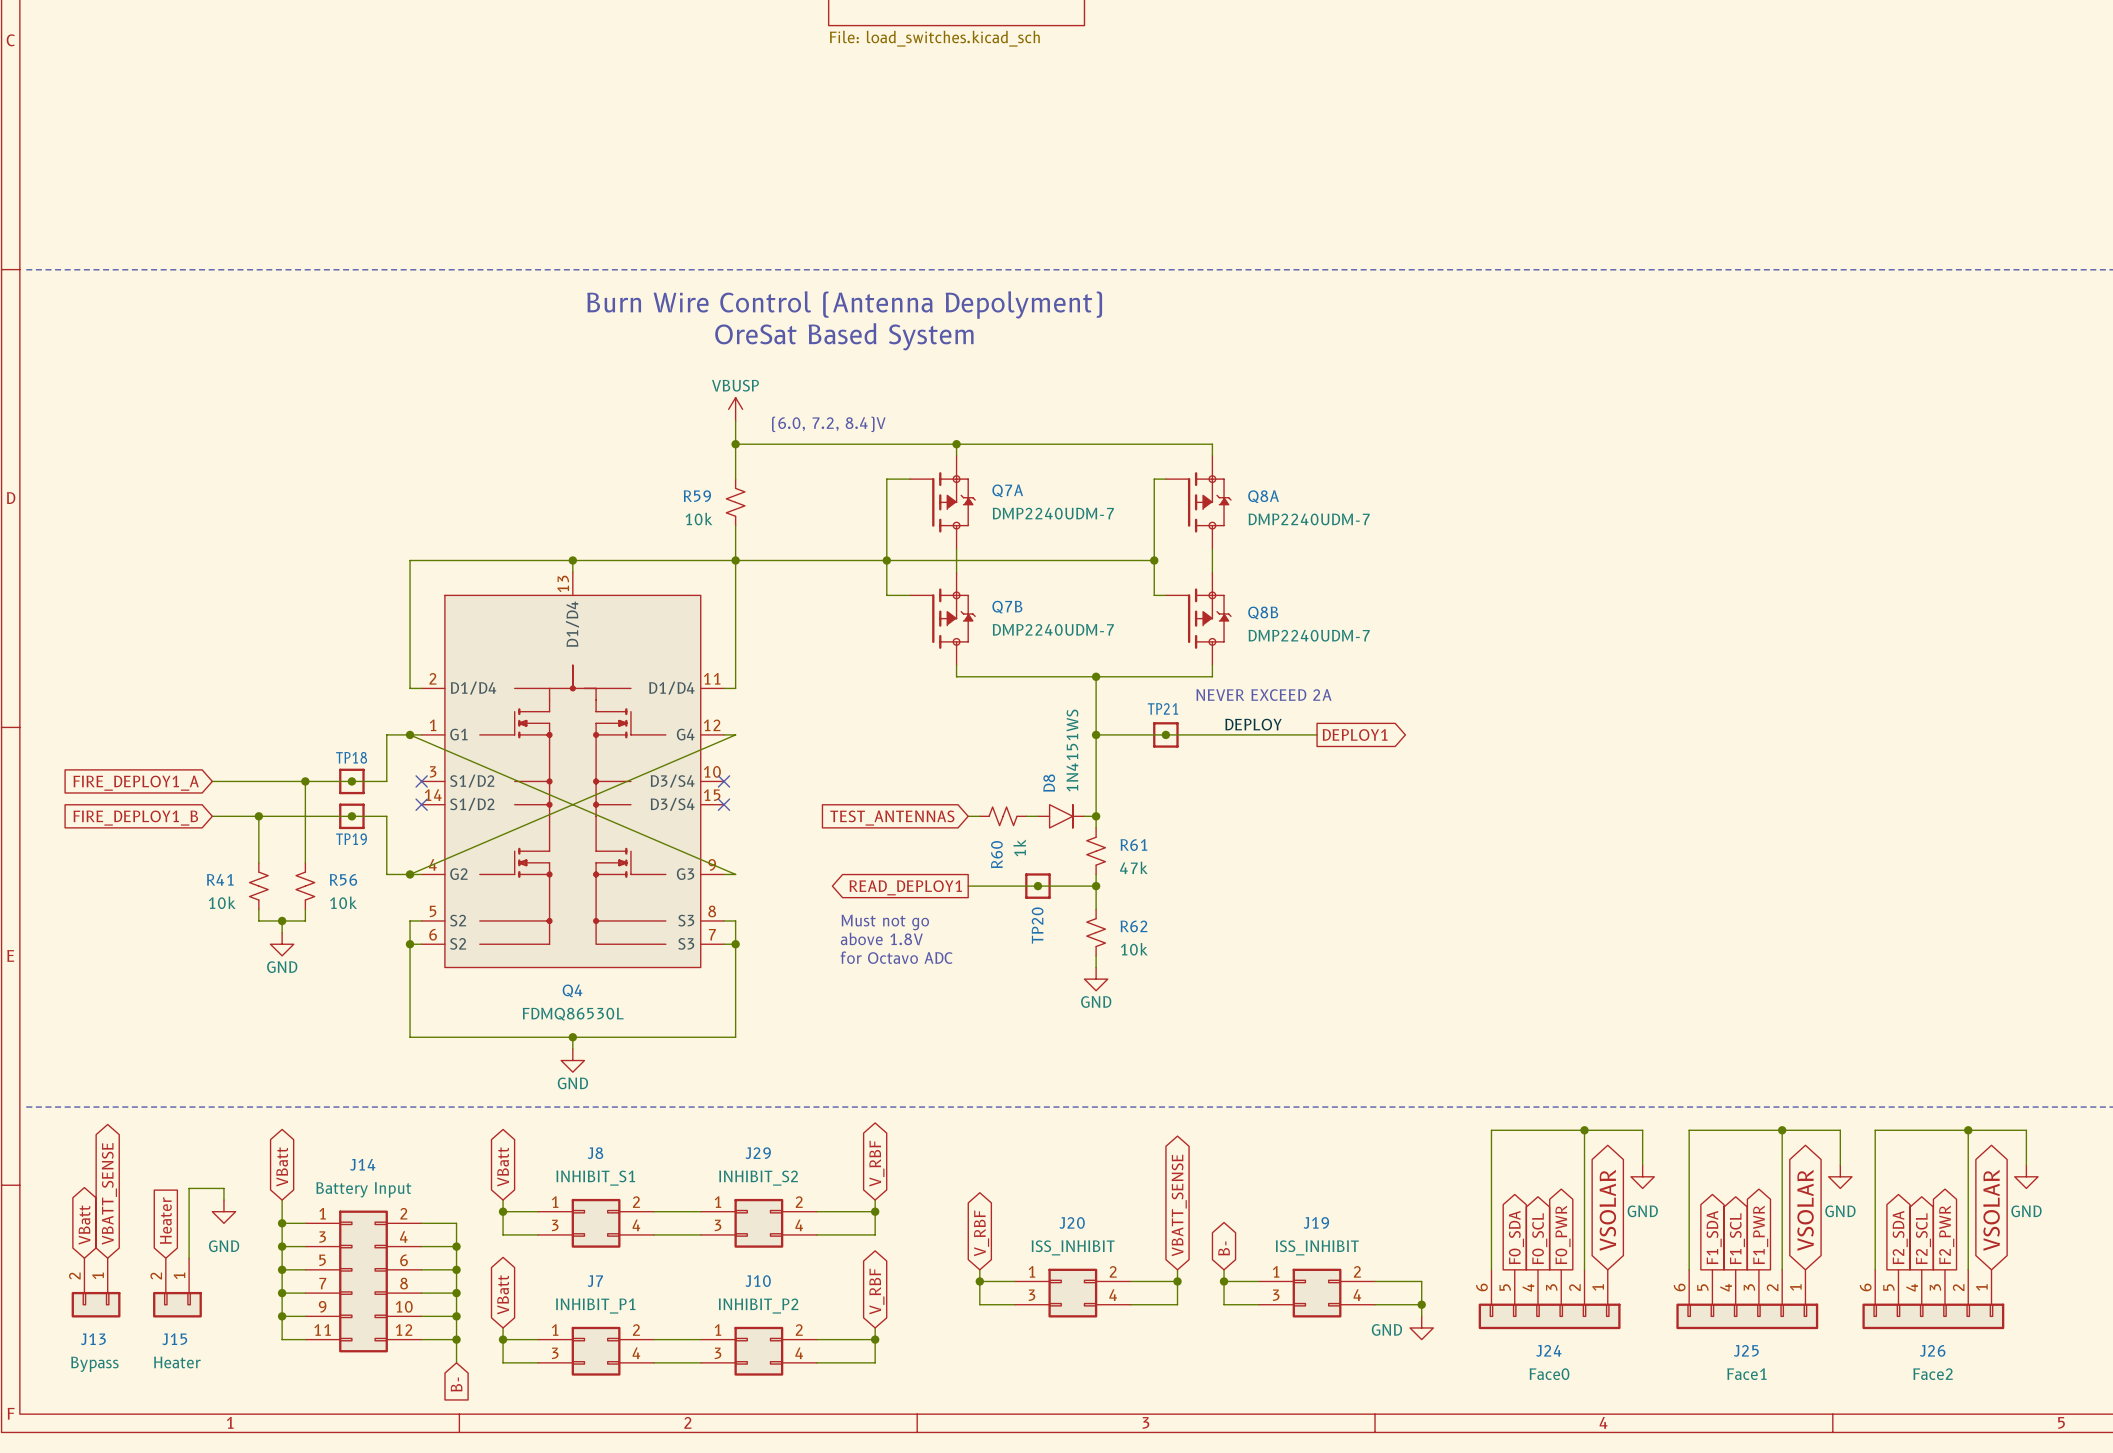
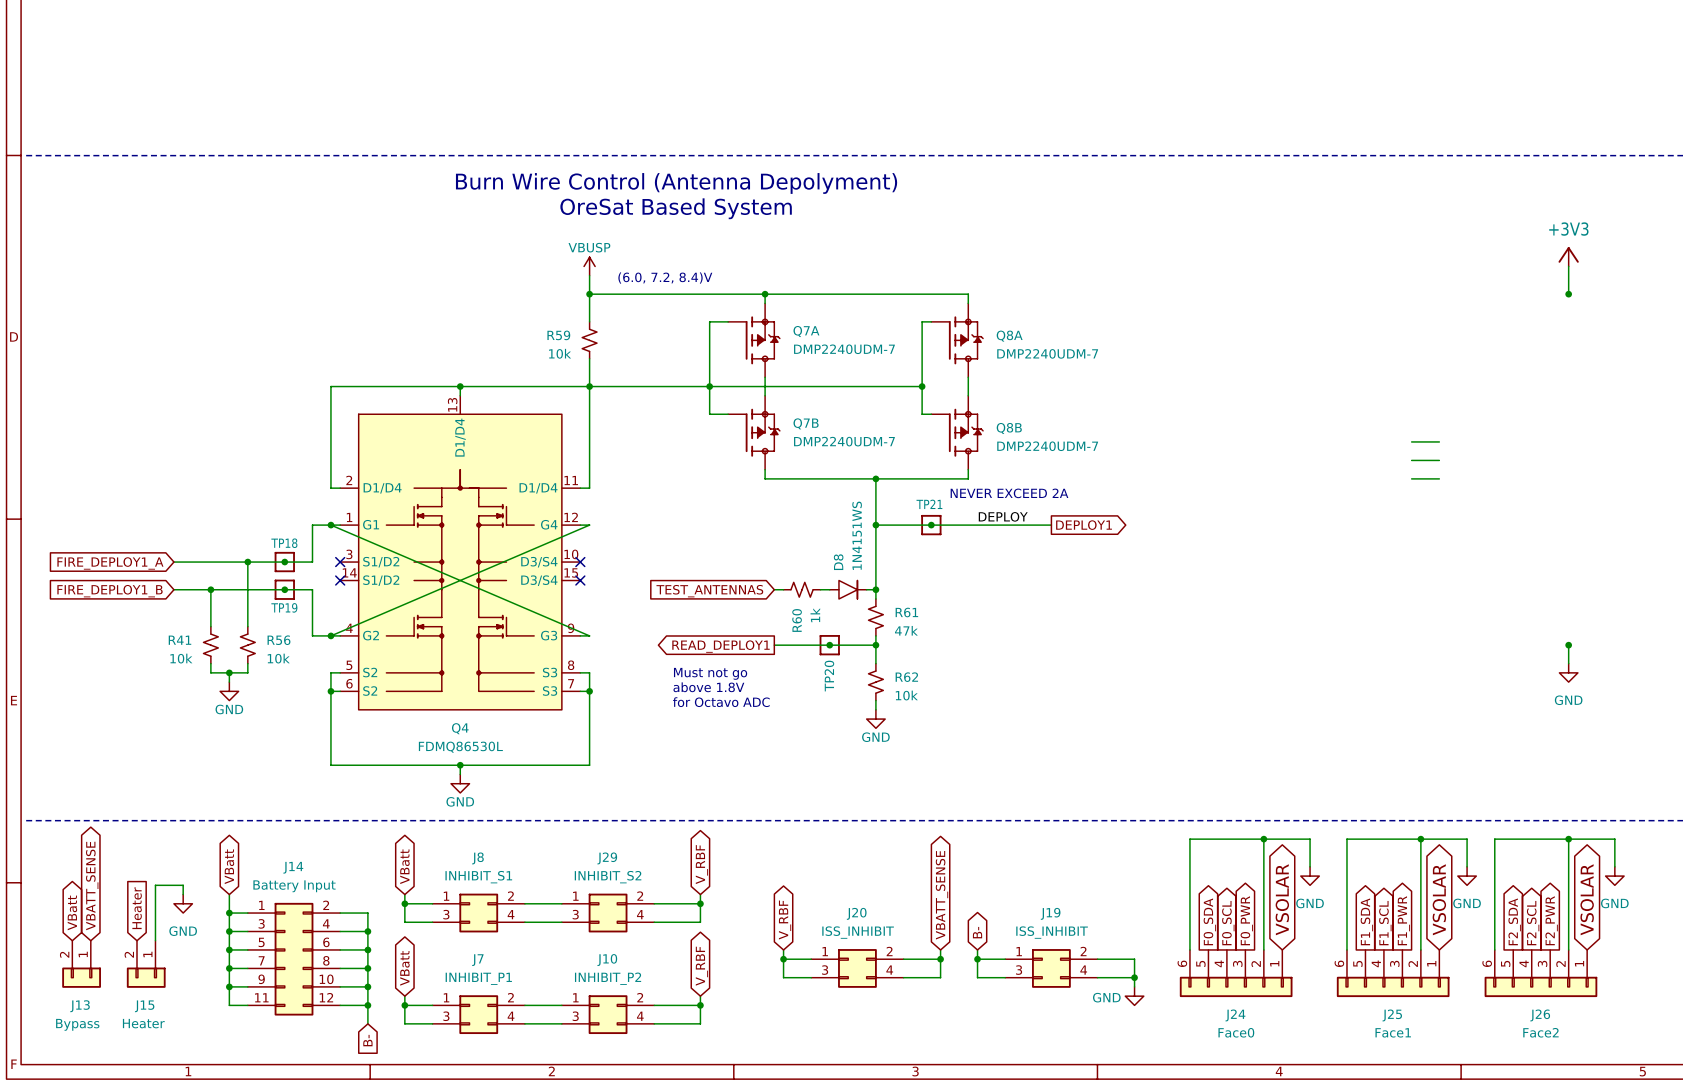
power symbol: none -> +3V3 (1568, 256)
wire: none -> (1568, 266) (1568, 294)
junction: none -> (1568, 294)
wire: none -> (1411, 441) (1439, 441)
wire: none -> (1411, 460) (1439, 460)
wire: none -> (1411, 478) (1439, 478)
wire: none -> (1568, 645) (1568, 663)
junction: none -> (1568, 645)
power symbol: none -> GND (1568, 672)

